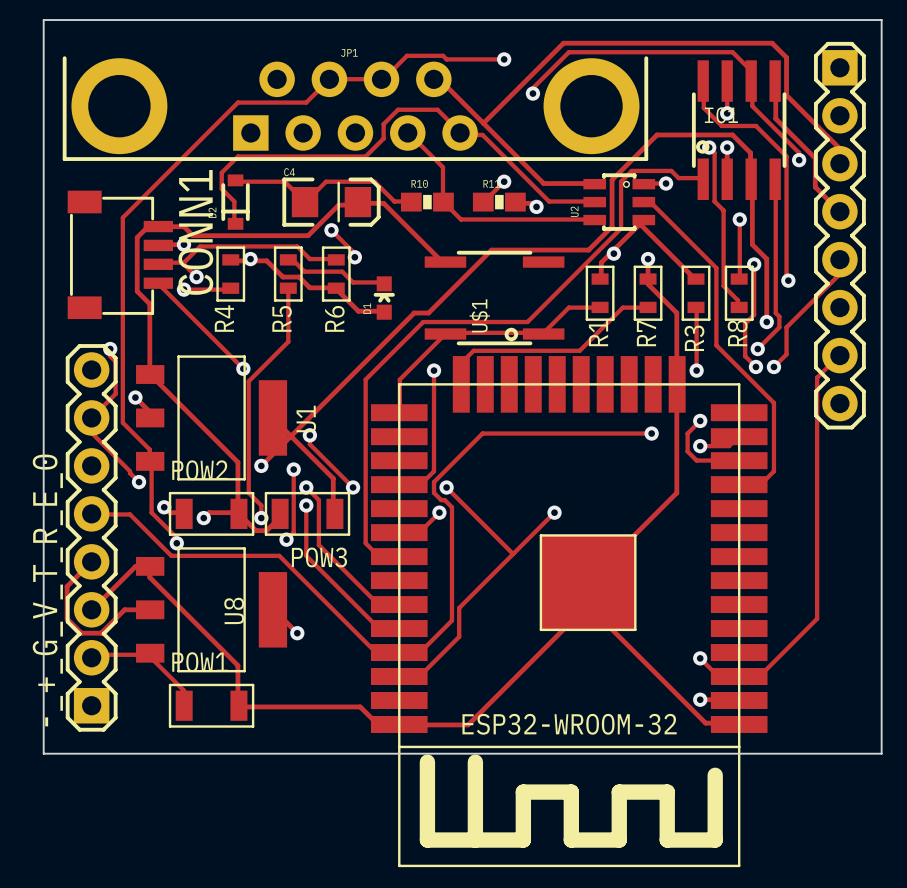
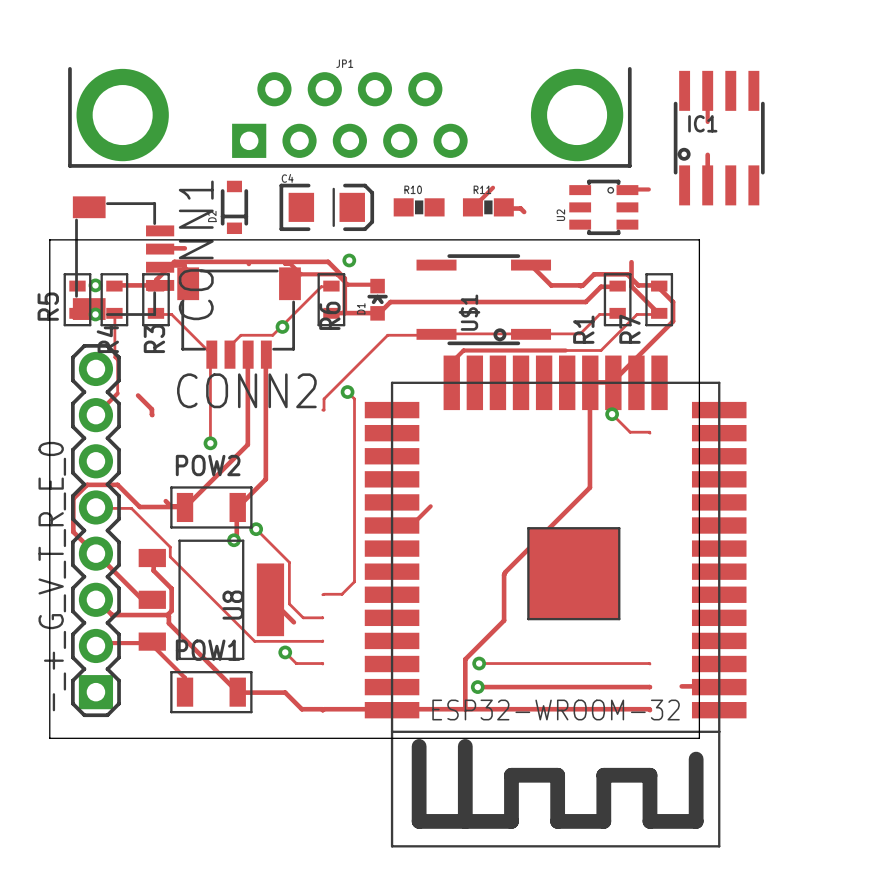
track: (504, 59) (446, 59) (443, 55) (407, 55) (383, 79) (329, 79) (306, 102) (237, 102) (122, 217) (122, 422) (149, 449) (151, 512) (176, 537) (176, 543) -> none
via: (504, 59) -> none
track: (433, 79) (434, 80) (441, 80) (543, 183) (594, 184) -> none
track: (703, 81) (703, 107) (721, 125) (755, 125) (786, 156) (786, 278) (788, 280) -> none
track: (775, 81) (775, 118) (815, 158) (815, 187) (839, 211) -> none
track: (532, 93) (532, 88) (568, 52) (732, 52) (750, 70) (752, 106) (799, 152) (799, 160) -> none
via: (532, 93) -> none
via: (727, 113) -> none
track: (483, 123) (563, 43) (772, 43) (786, 57) (786, 95) (838, 147) (839, 163) -> none
track: (407, 132) (443, 167) (443, 201) (460, 219) (594, 220) -> none
track: (709, 147) (714, 152) (714, 201) (723, 210) (723, 286) (737, 300) (739, 307) -> none
via: (709, 147) -> none
via: (727, 147) -> none
via: (799, 160) -> none
track: (703, 179) (678, 178) (671, 170) (631, 170) (621, 181) (621, 228) (527, 322) (423, 322) (365, 379) (365, 543) (378, 555) (399, 556) -> none
track: (775, 179) (775, 313) (779, 316) (779, 327) (757, 349) -> none
track: (235, 180) (284, 181) (305, 202) (326, 181) (374, 181) (394, 201) (411, 202) -> none
via: (504, 181) -> none
via: (666, 183) -> none
track: (594, 202) (549, 201) (482, 134) (460, 134) (437, 109) (398, 109) (383, 124) (383, 138) (365, 156) (237, 156) (221, 172) (221, 188) (234, 201) (235, 223) -> none
track: (643, 202) (651, 203) (716, 268) (716, 345) (773, 402) (773, 471) (761, 483) (739, 484) -> none
via: (536, 206) -> none
track: (739, 219) (739, 279) -> none
via: (739, 219) -> none
track: (331, 230) (354, 253) (354, 257) -> none
via: (331, 230) -> none
board edge: (43, 235) (43, 20) (881, 20) (881, 753) (718, 753) -> (49, 239) (699, 239) (699, 738)
part: (839, 235) -> none
via: (183, 244) -> none
via: (613, 253) -> none
track: (230, 259) (266, 260) (282, 277) (299, 277) (309, 287) (336, 288) (358, 311) (384, 312) -> none
via: (250, 259) -> none
track: (336, 259) (309, 259) (297, 246) (200, 246) (183, 262) -> none
via: (648, 259) -> none
track: (839, 259) (838, 275) (786, 327) (786, 354) (773, 366) -> none
track: (445, 262) (441, 260) (383, 203) (357, 202) (356, 205) (338, 205) (308, 235) (192, 235) (183, 226) (158, 226) (148, 226) (137, 237) (137, 291) (149, 304) (149, 374) (237, 462) (238, 513) -> none
track: none -> (531, 265) (551, 285) (580, 286) (594, 274) (627, 274) (638, 285) (659, 285) (659, 288) (673, 302) (673, 321) (612, 382) (590, 382) (589, 487) (504, 573) (504, 620) (465, 659) (465, 709)
track: (754, 264) (754, 314) (745, 323) (745, 356) (755, 366) -> none
via: (754, 264) -> none
R4 position: (230, 274) -> (114, 299)
R5 position: (288, 274) -> (77, 299)
R6 position: (336, 274) -> (331, 299)
via: (196, 277) -> none
track: (600, 279) (601, 262) (643, 220) (640, 224) (696, 279) -> none
via: (788, 280) -> none
via: none -> (95, 285)
track: none -> (114, 286) (155, 286) (156, 279) (174, 261) (328, 261) (344, 278) (344, 313)
track: (158, 283) (243, 368) -> none
track: none -> (331, 286) (321, 286) (272, 335) (240, 335) (231, 344) (229, 354)
track: none -> (617, 286) (601, 286) (585, 302) (390, 302) (379, 313) (331, 313)
track: (230, 288) (183, 289) -> none
track: (288, 288) (288, 341) (248, 381) (248, 492) (261, 505) (261, 518) -> none
via: (183, 289) -> none
R1 position: (600, 293) -> (617, 299)
R7 position: (648, 293) -> (659, 299)
R3 position: (696, 293) -> (155, 299)
R8: (739, 293) -> none
track: (600, 307) (568, 307) (543, 334) (446, 332) (399, 379) (399, 412) -> none
track: (648, 307) (622, 307) (579, 350) -> (659, 314) (637, 314) (601, 350) (565, 350)
track: (696, 307) (696, 370) -> none
track: none -> (155, 313) (171, 314) (211, 354) (210, 443)
track: none -> (617, 313) (599, 314) (580, 333) (387, 335) (324, 398) (322, 410)
via: none -> (95, 314)
track: (676, 313) (676, 492) (588, 582) -> none
CONN2: none -> (239, 318)
R5 name position: R5 (282, 318) -> R5 (48, 306)
track: (766, 322) (766, 259) (752, 244) (750, 152) (732, 134) (657, 134) (612, 179) (612, 226) (588, 250) (491, 250) (428, 313) (414, 313) (261, 465) -> none
via: (766, 322) -> none
via: none -> (282, 326)
track: (110, 349) (110, 356) (115, 361) (114, 395) -> (114, 313) (117, 393)
via: (110, 349) -> none
via: (757, 349) -> none
track: none -> (266, 354) (265, 479) (236, 508) (236, 537) (234, 540)
track: (839, 355) (817, 377) (817, 618) (759, 676) (718, 676) (700, 658) -> none
via: (755, 366) -> none
via: (773, 366) -> none
via: (243, 368) -> none
track: (434, 370) (434, 471) (421, 483) (399, 484) -> none
via: (434, 370) -> none
via: (696, 370) -> none
track: none -> (347, 392) (354, 398) (354, 581) (342, 594) (322, 594)
via: none -> (347, 392)
via: (135, 397) -> none
track: none -> (612, 414) (630, 432) (649, 433)
track: (91, 417) (92, 433) (139, 482) -> none
U1: (211, 417) -> none
track: (272, 417) (333, 478) (333, 512) (334, 513) -> none
track: (700, 420) (687, 433) (687, 451) (696, 460) (739, 460) -> none
via: (700, 420) -> none
track: (651, 433) (482, 433) (434, 482) (434, 492) (452, 507) (452, 620) (421, 651) (374, 651) (279, 555) (171, 555) (130, 514) (92, 514) -> none
via position: (651, 433) -> (612, 414)
track: (309, 435) (309, 444) (353, 487) -> none
via: (309, 435) -> none
track: (739, 436) (728, 446) (700, 446) -> none
via: (700, 446) -> none
via: none -> (210, 443)
via: (261, 465) -> none
track: (293, 469) (293, 532) (286, 539) -> none
via: (293, 469) -> none
via: (139, 482) -> none
track: (306, 487) (318, 500) (318, 545) (378, 604) (399, 604) -> none
via: (306, 487) -> none
via: (353, 487) -> none
track: (446, 487) (513, 554) -> none
via: (446, 487) -> none
track: (306, 505) (306, 555) (378, 627) (399, 628) -> none
via: (306, 505) -> none
via: (164, 507) -> none
via: (439, 512) -> none
track: (554, 512) (459, 608) (459, 636) (419, 676) (399, 676) -> none
via: (554, 512) -> none
track: none -> (95, 507) (131, 508) (170, 547) (170, 556) (254, 641) (322, 640)
track: (238, 513) (255, 530) (266, 530) (279, 518) (280, 513) -> none
track: (238, 513) (209, 512) (203, 518) -> none
POW3: (307, 513) -> none
via: (203, 518) -> none
via: (261, 518) -> none
track: none -> (256, 529) (289, 562) (289, 603) (303, 617) (322, 617)
via: none -> (256, 529)
via: (286, 539) -> none
via: (176, 543) -> none
via: none -> (234, 540)
track: (91, 561) (67, 586) (67, 618) (81, 633) (101, 633) (124, 609) (140, 609) -> (247, 354) (247, 444) (185, 507) (139, 507) (117, 484) (87, 484) (73, 498) (73, 531) (142, 599)
track: none -> (152, 558) (153, 570) (171, 588) (171, 610) (167, 615)
track: (588, 582) (586, 606) (468, 724) (376, 723) (360, 706) (239, 706) (237, 705) (237, 665) (149, 577) (150, 566) (135, 566) (92, 609) -> (167, 615) (112, 615) (96, 599)
track: (588, 582) (588, 606) (705, 723) (739, 724) -> none
track: none -> (167, 615) (168, 623) (238, 692) (285, 692) (301, 709) (649, 710)
via position: (297, 633) -> (285, 652)
via: (700, 658) -> none
track: none -> (285, 652) (296, 663) (322, 664)
track: none -> (479, 663) (649, 664)
via: none -> (479, 663)
via: (700, 699) -> none
track: none -> (477, 687) (649, 687)
via: none -> (477, 687)

